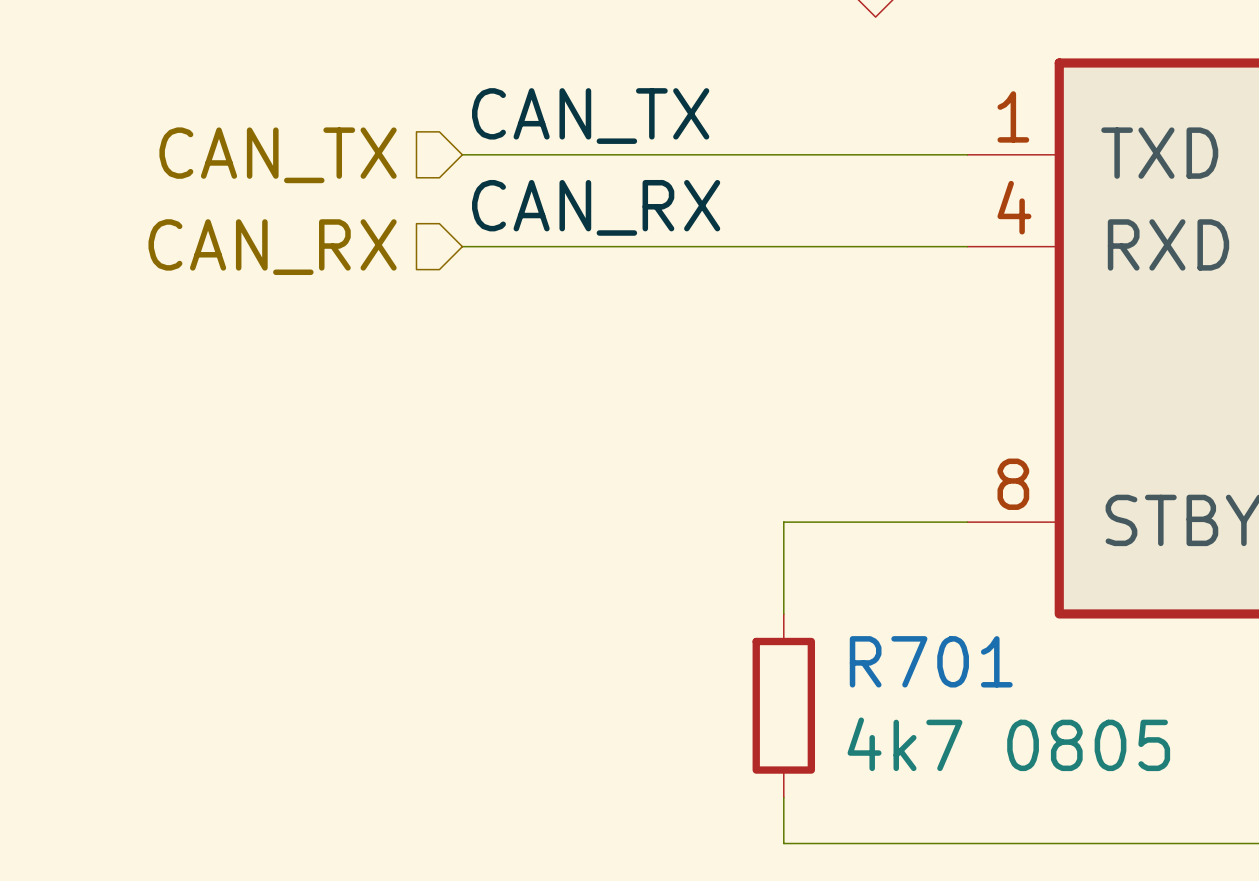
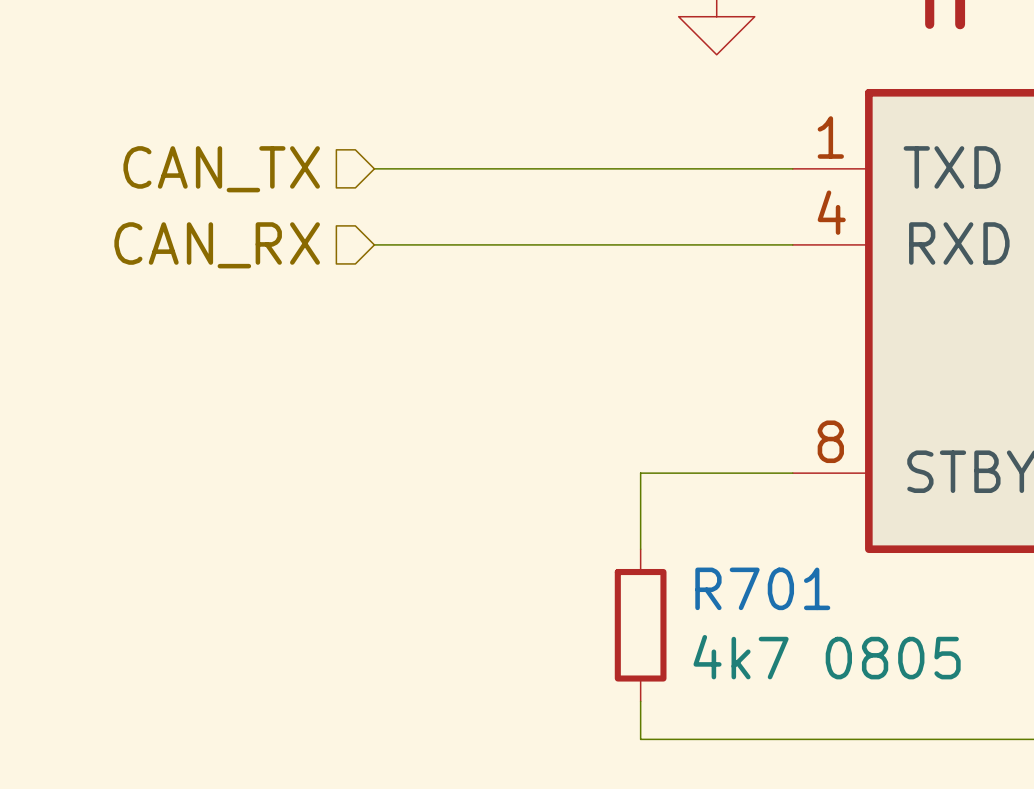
label: CAN_TX (590, 116) -> none
label: CAN_RX (596, 207) -> none

